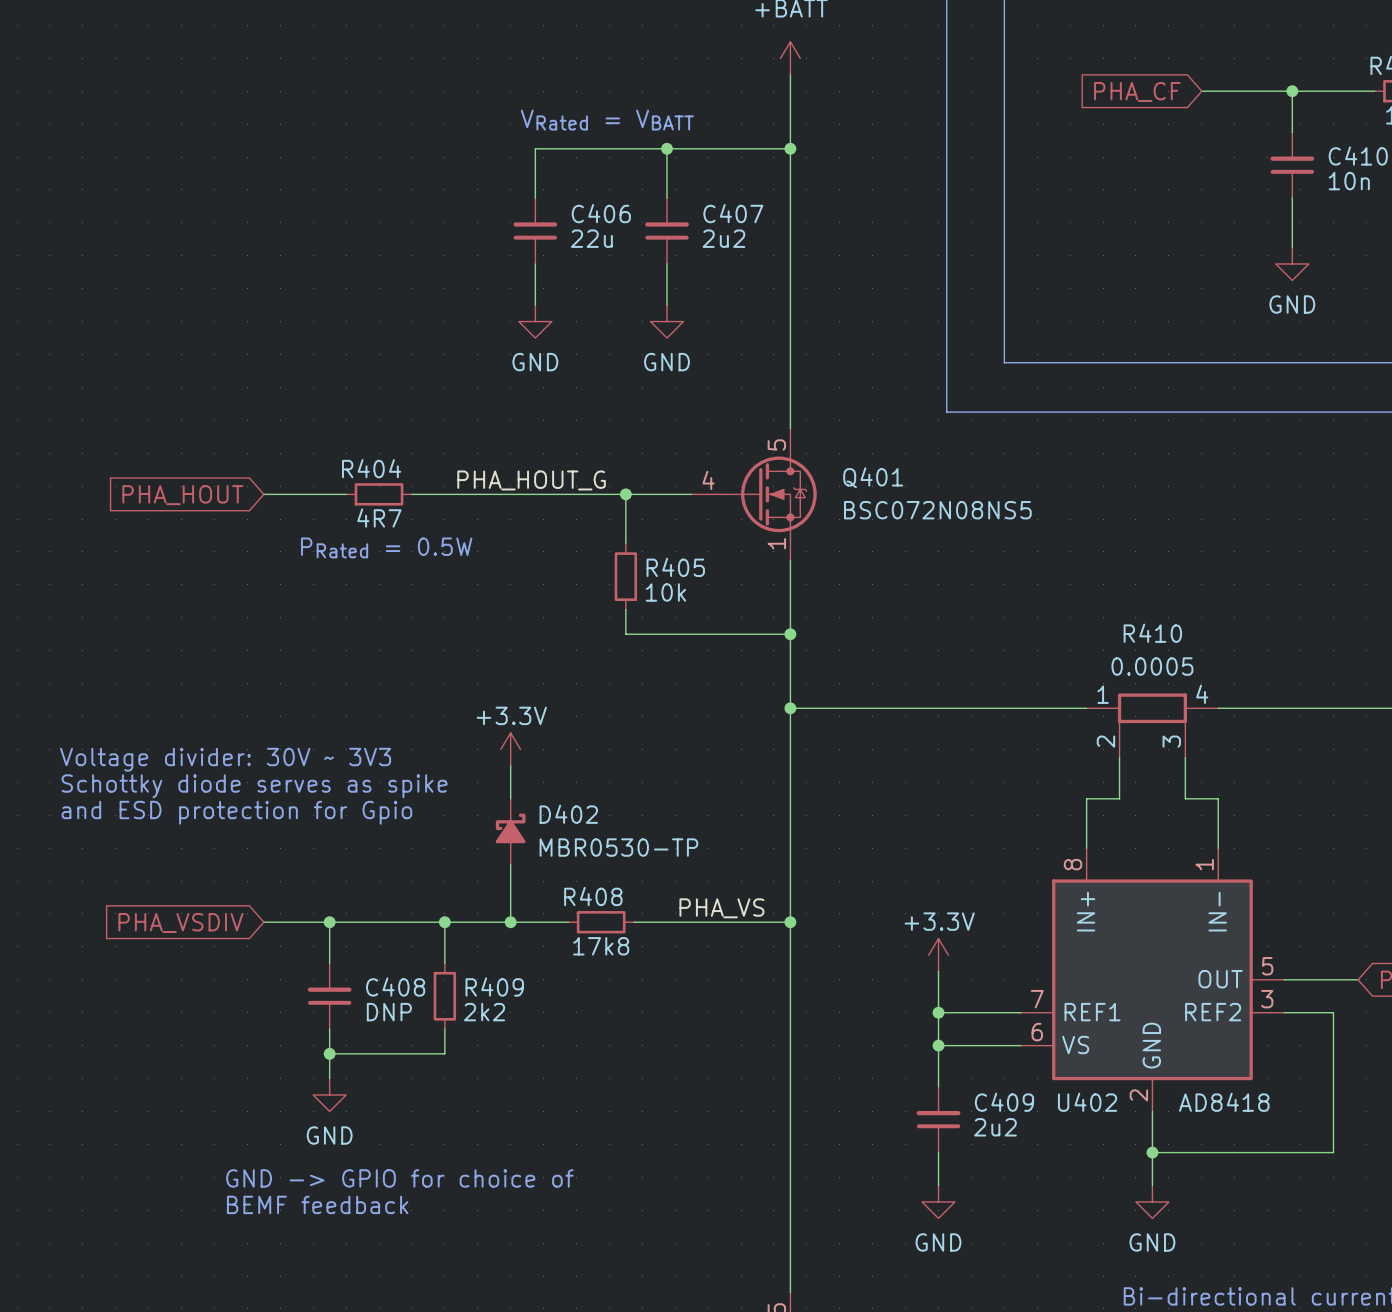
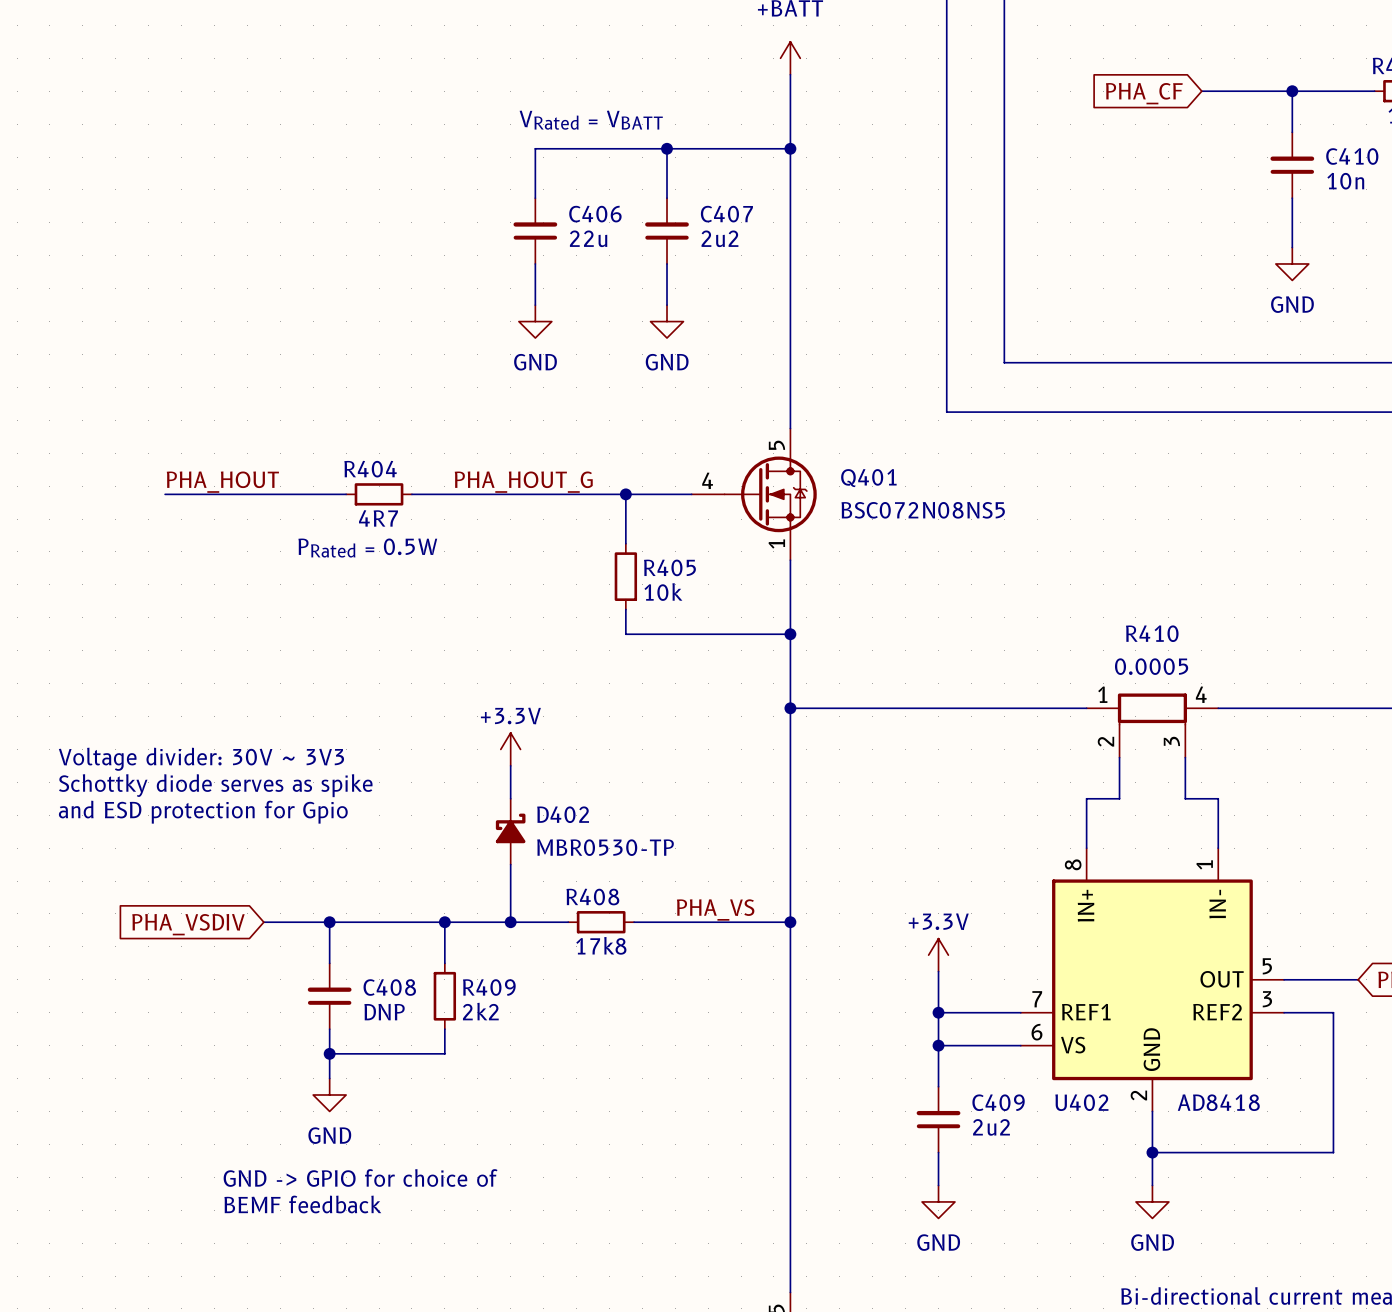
label: none -> PHA_HOUT (222, 482)
wire: none -> (165, 494) (263, 494)
global label: PHA_HOUT (182, 495) -> none

